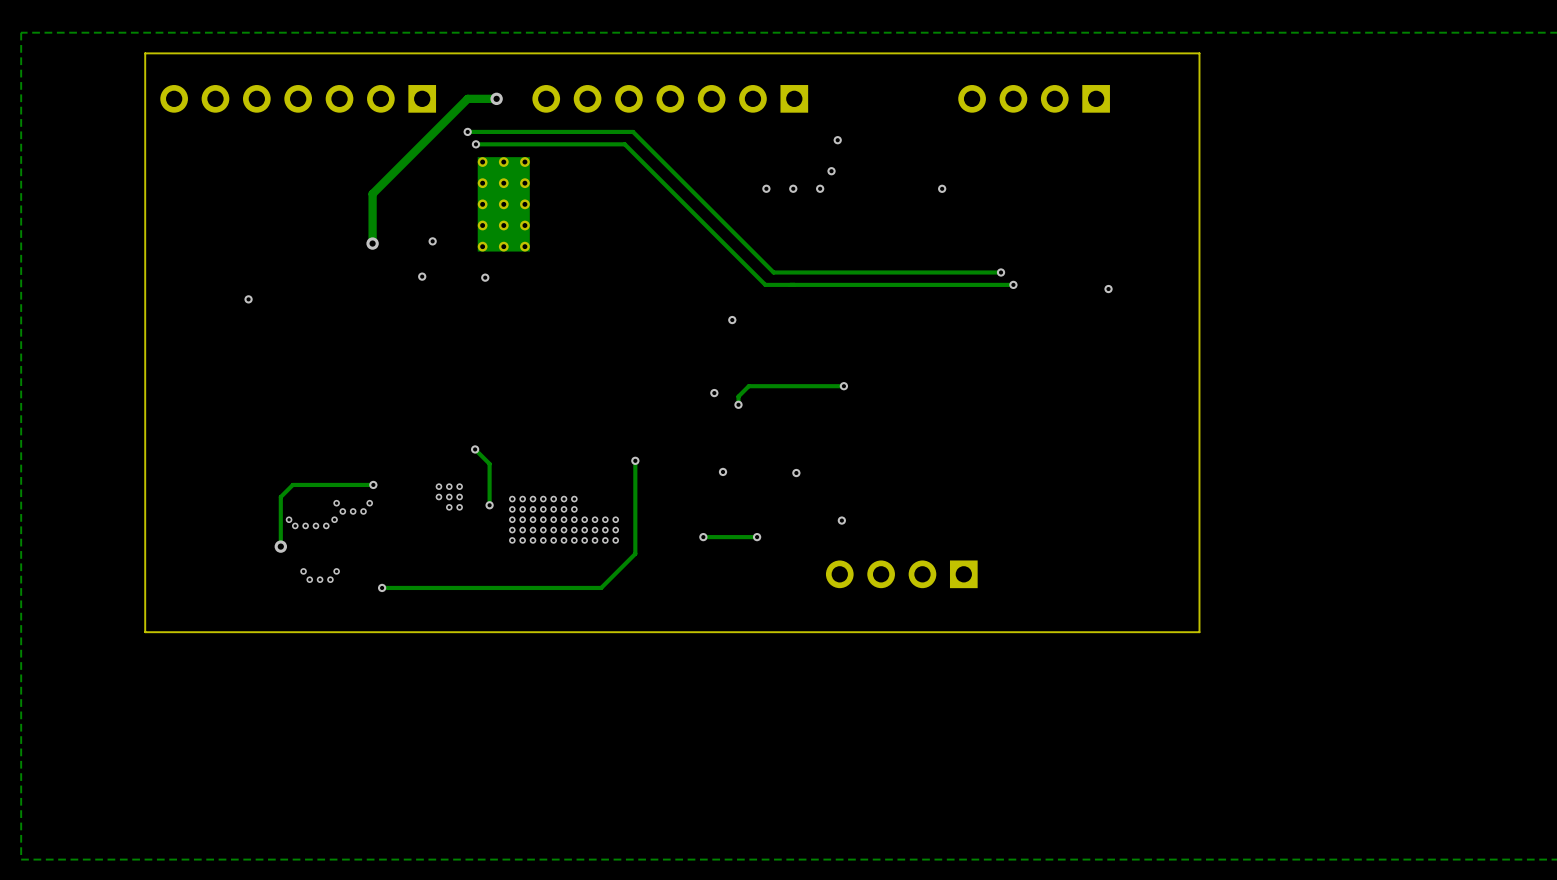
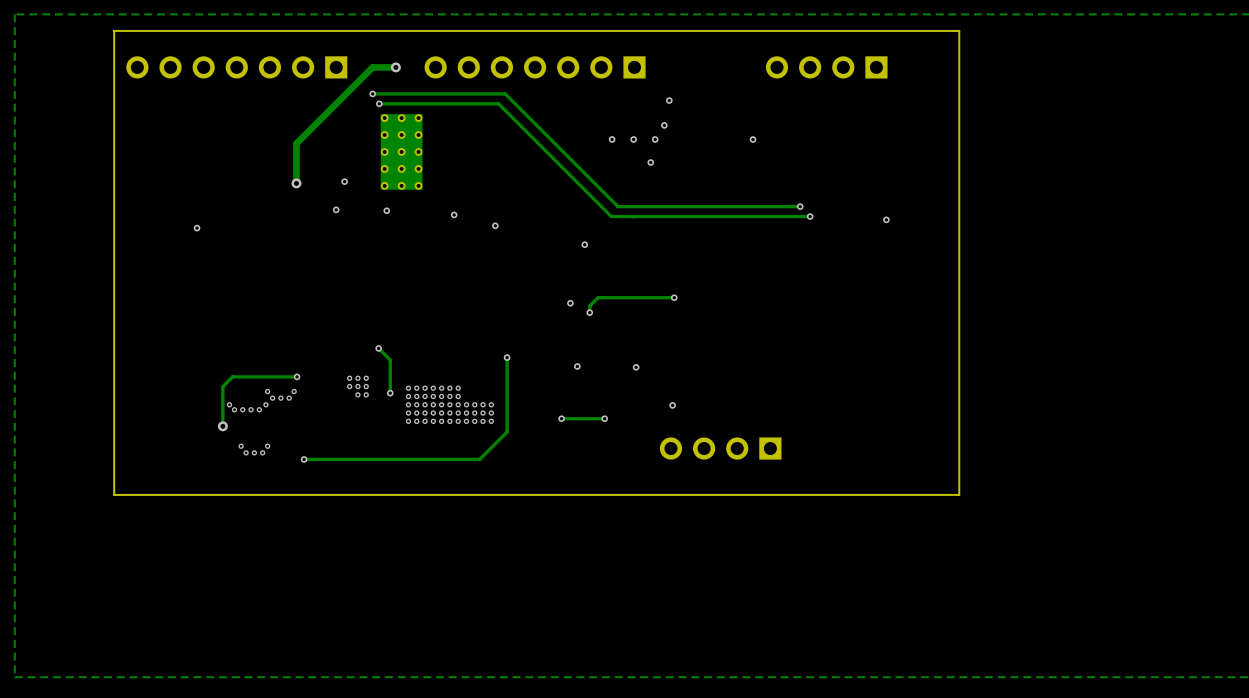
via: none -> (650, 162)
via: none -> (454, 214)
via: none -> (495, 225)

